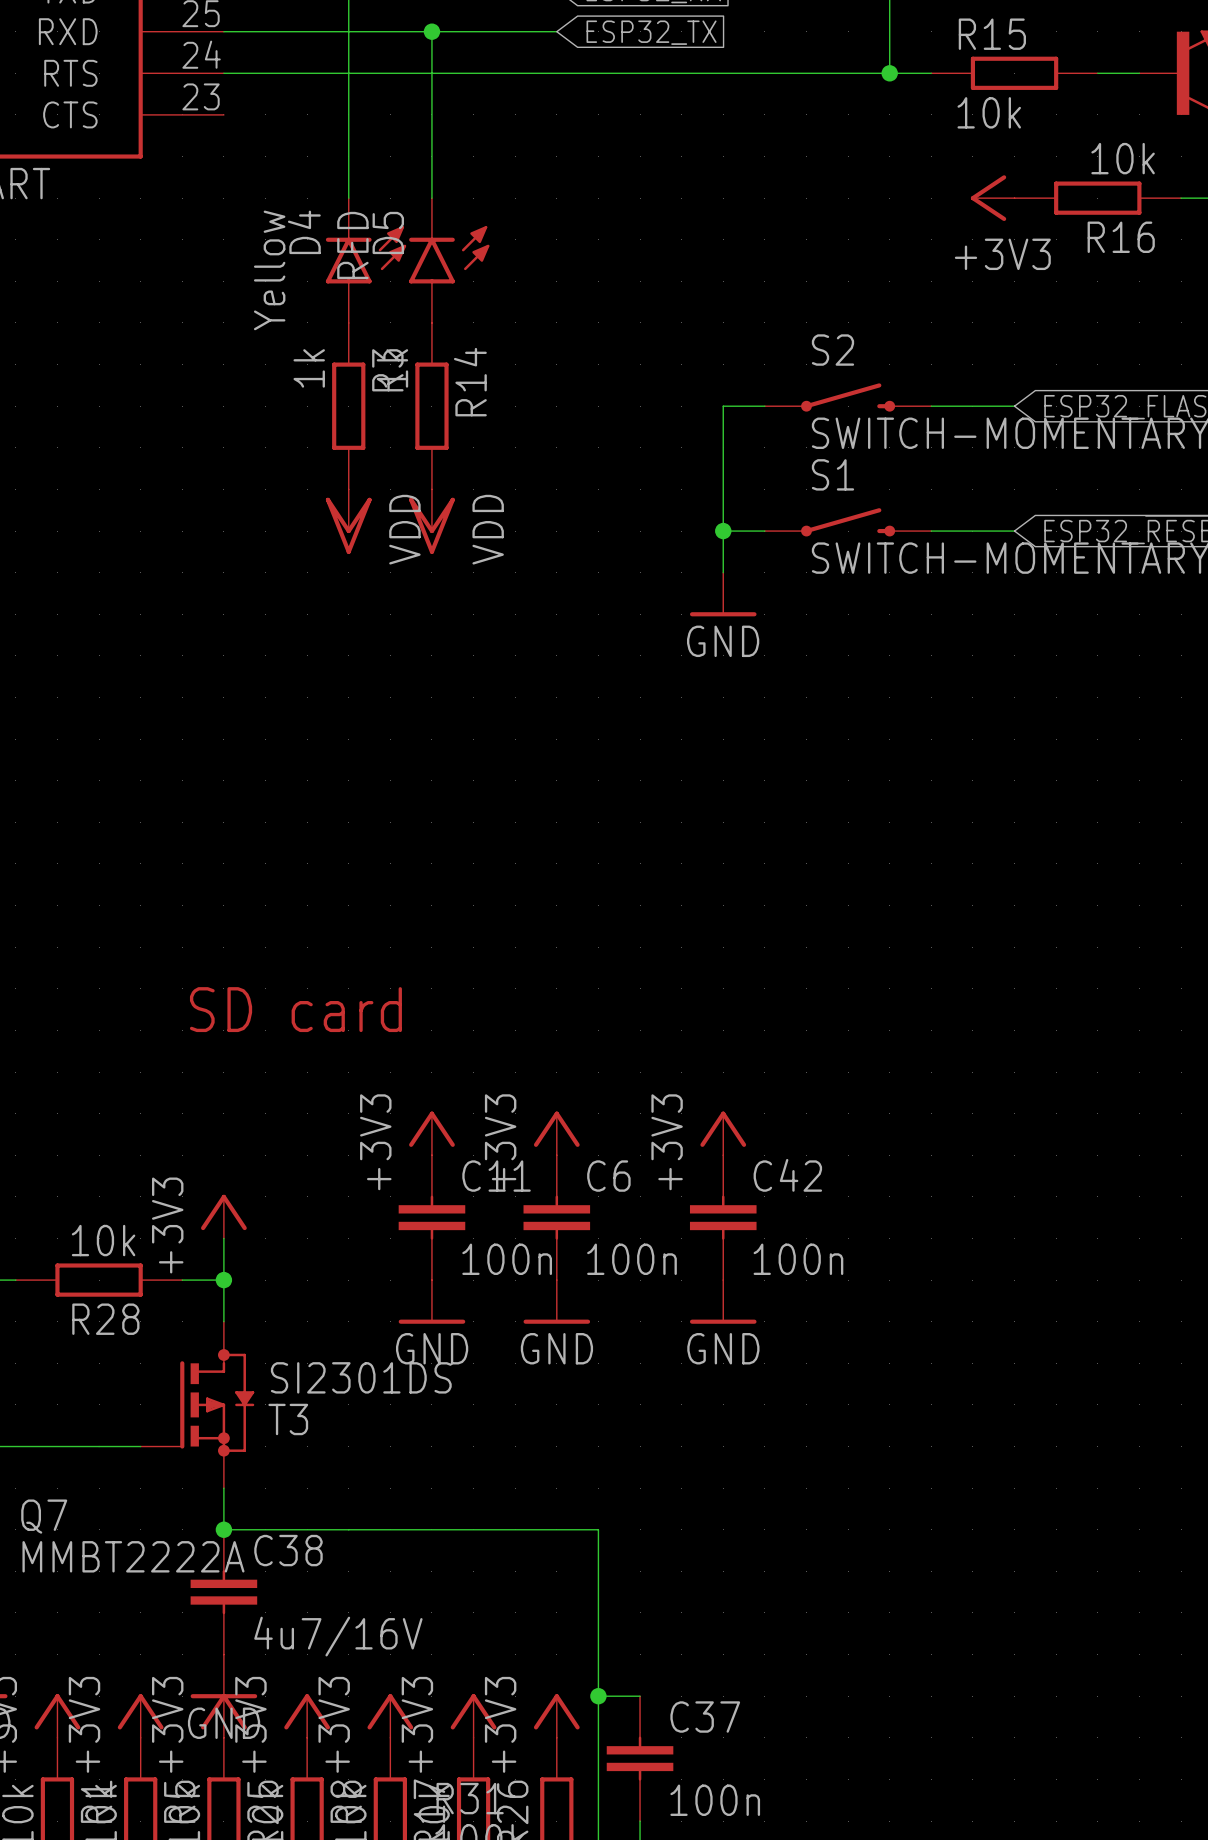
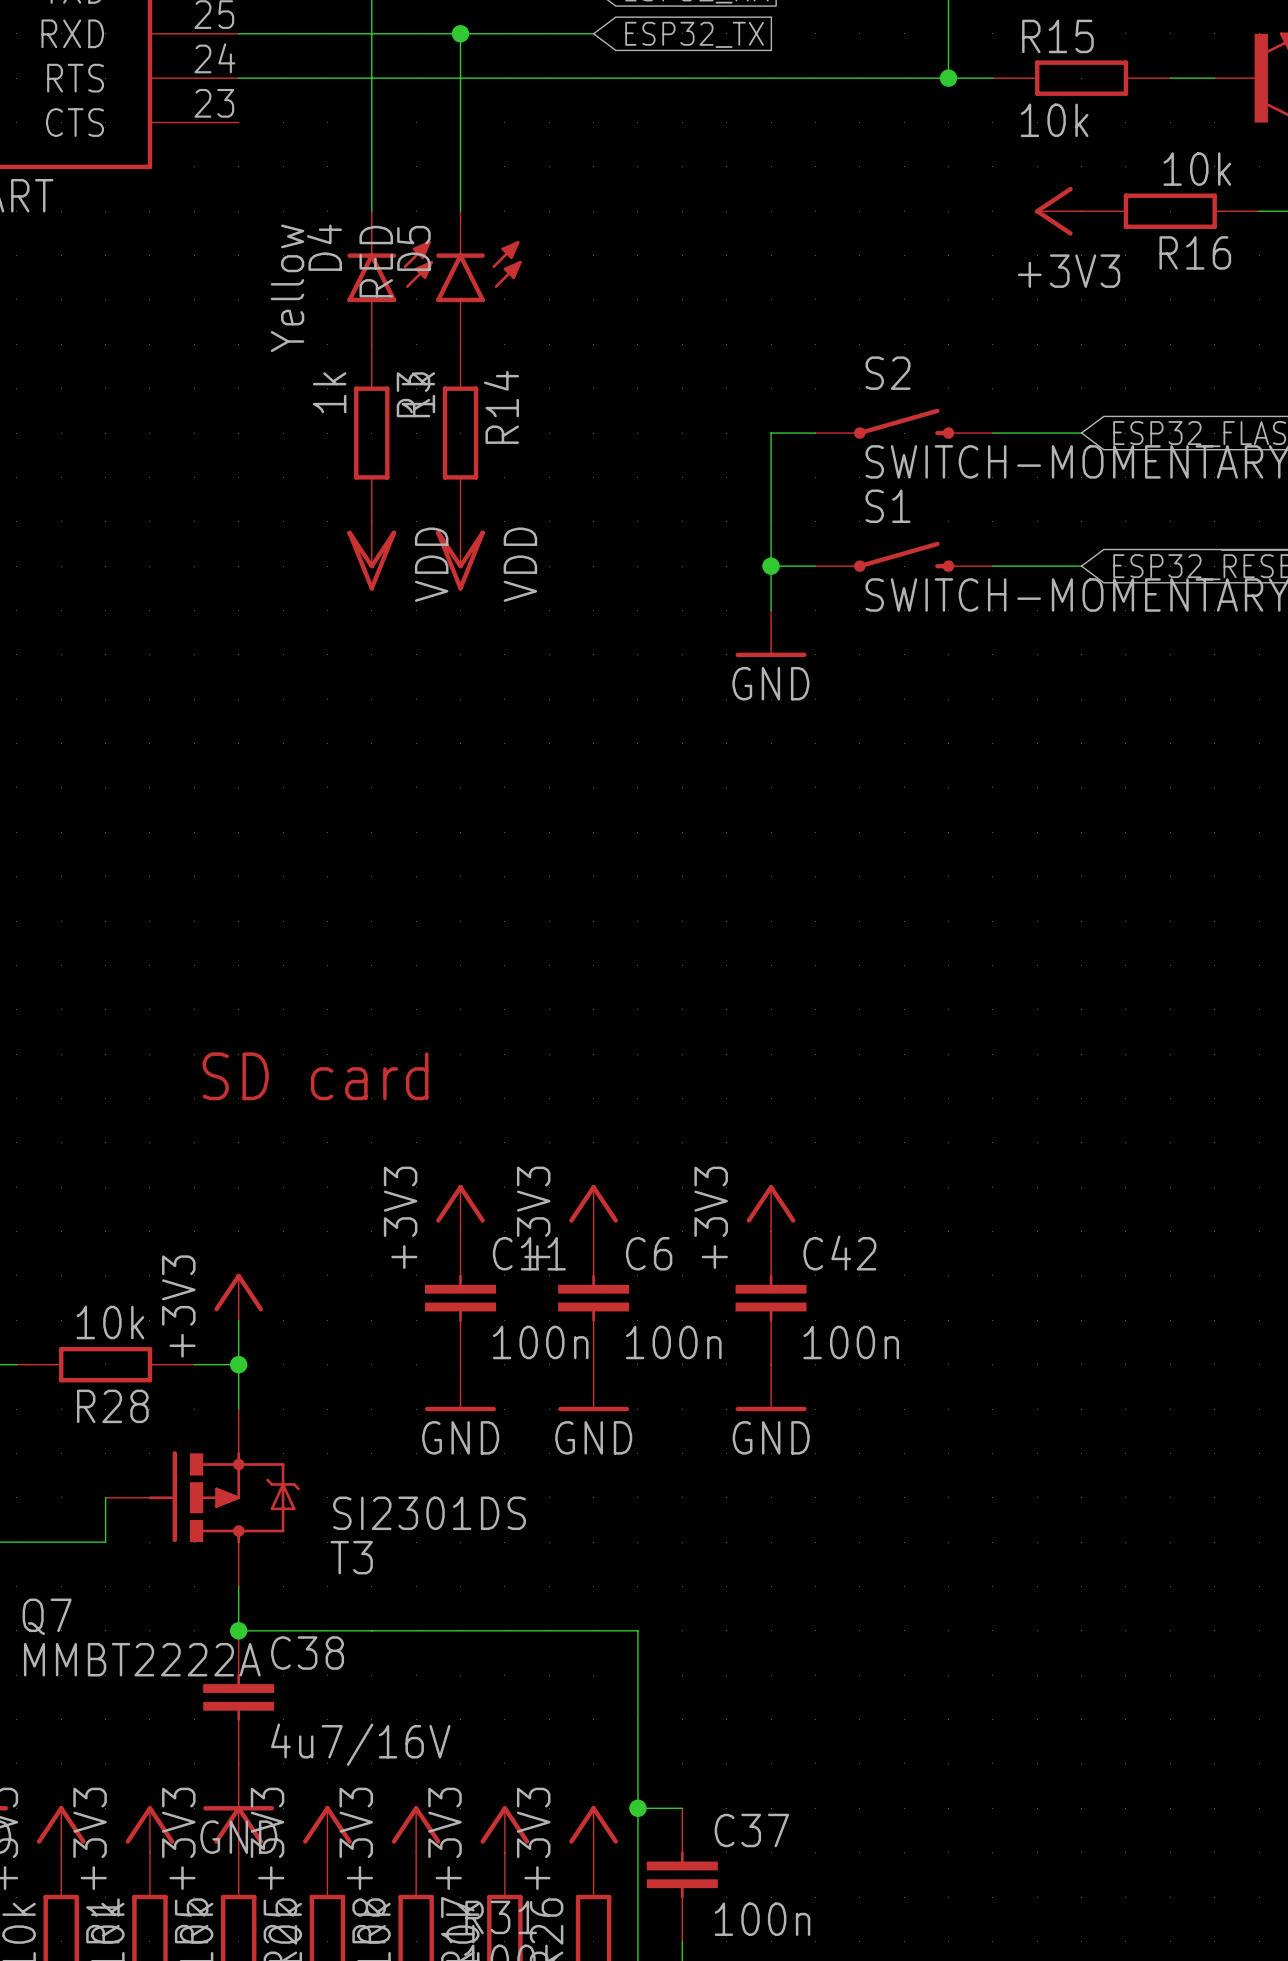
T3 symbol: [140, 1321, 255, 1489] -> [105, 1409, 300, 1587]
T3 value position: SI2301DS (361, 1377) -> SI2301DS (429, 1513)
T3 name position: T3 (288, 1419) -> T3 (351, 1557)
wire: (99, 1446) (140, 1446) -> (105, 1542) (105, 1497)

